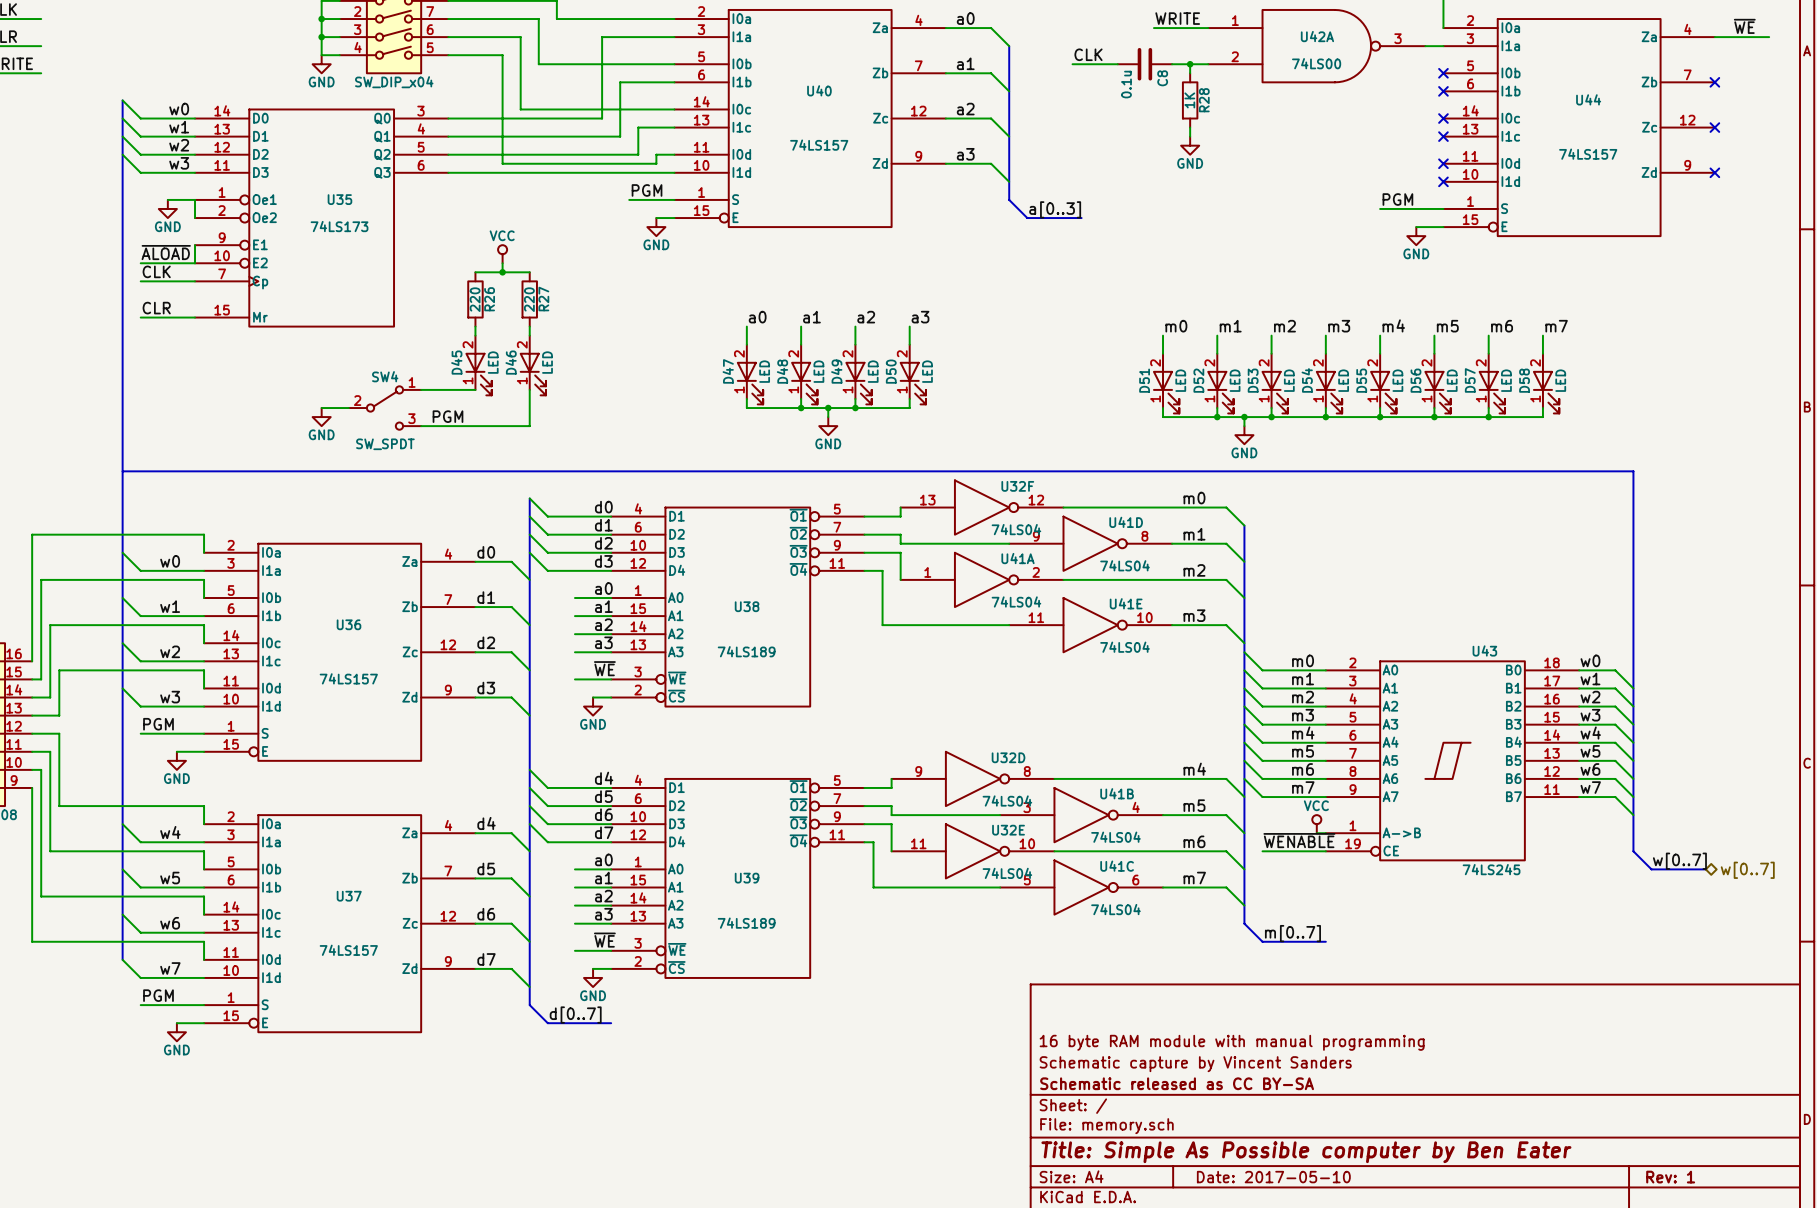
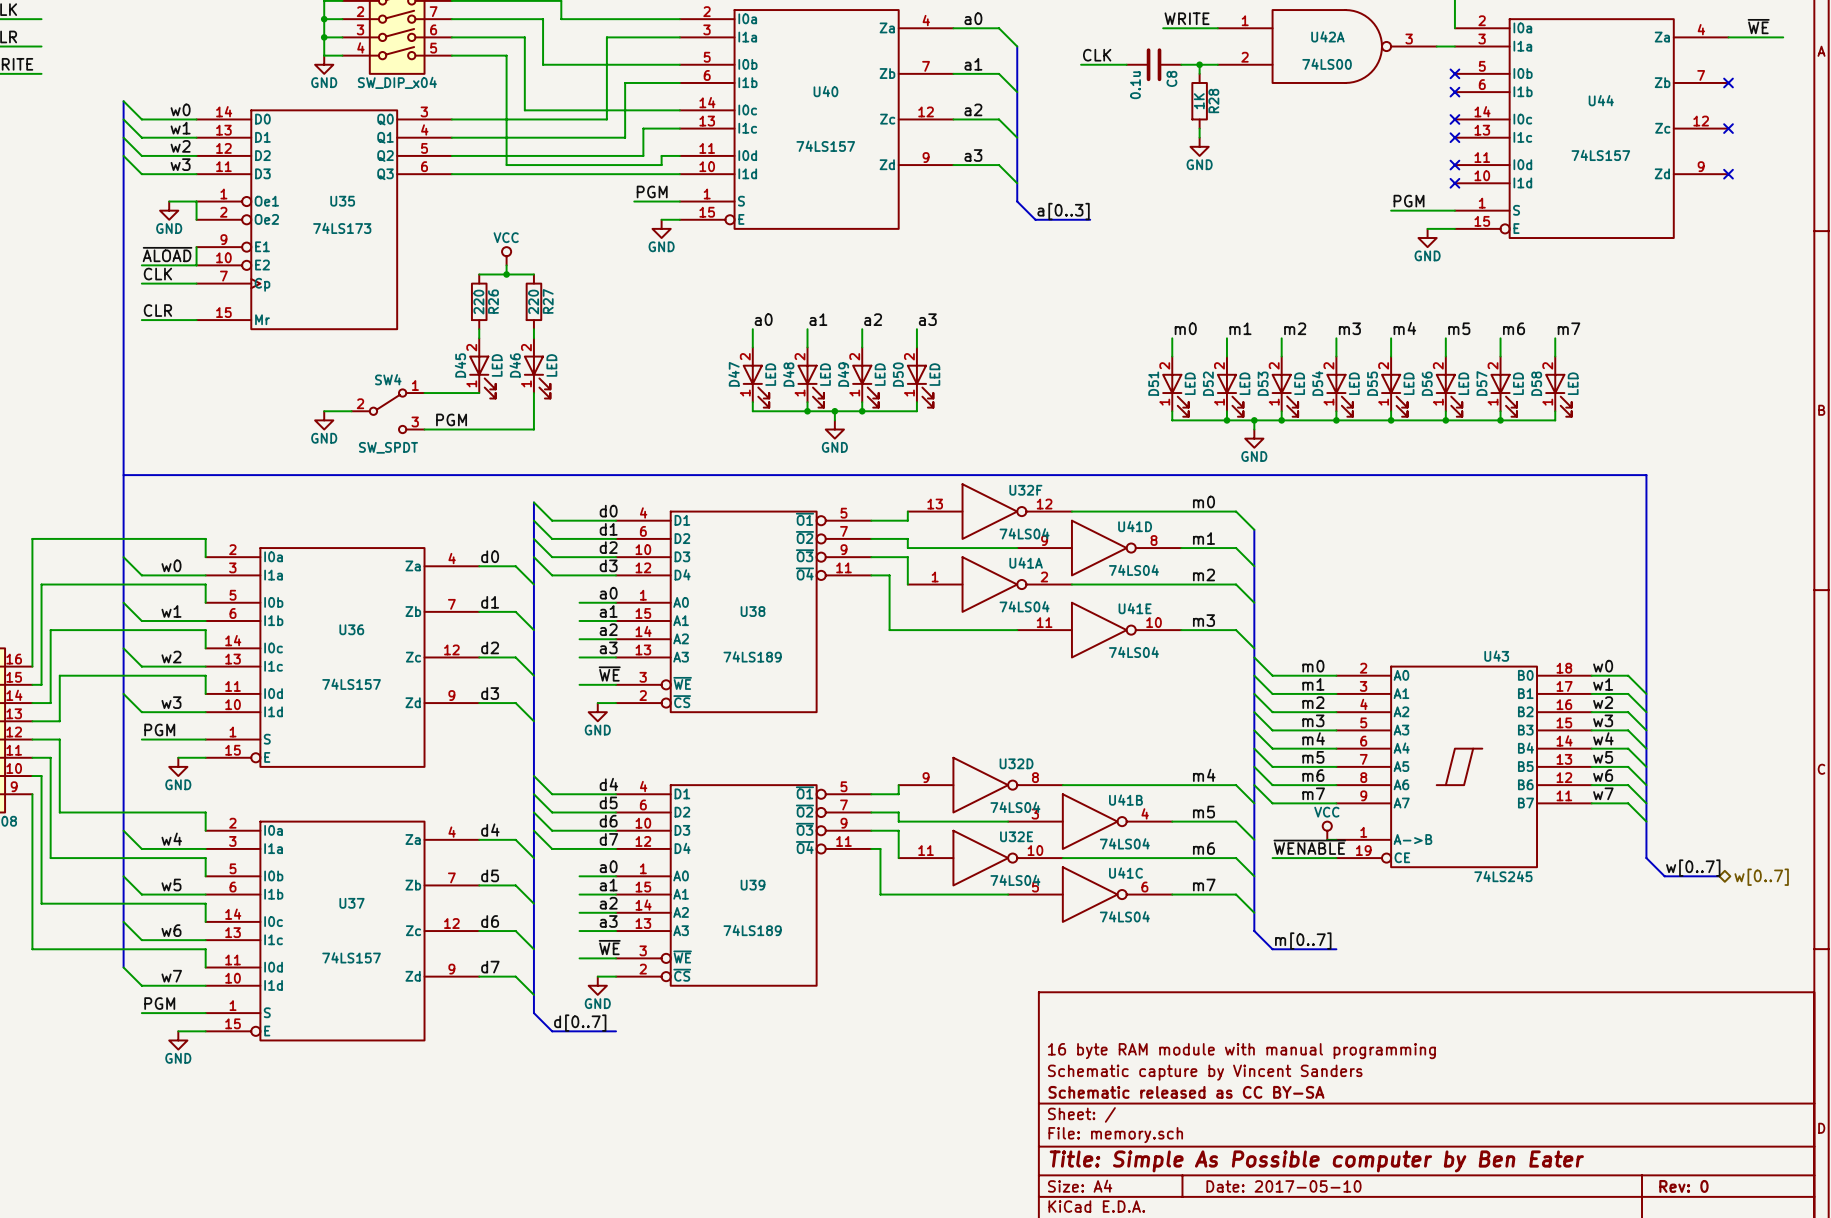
title block: Rev: 1 (1670, 1177) -> Rev: 0 (1683, 1186)

